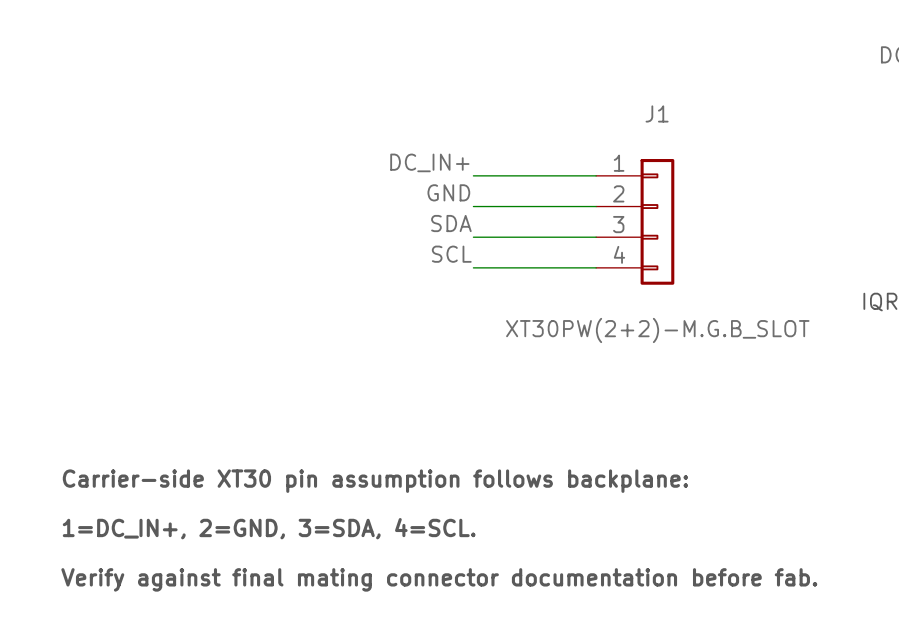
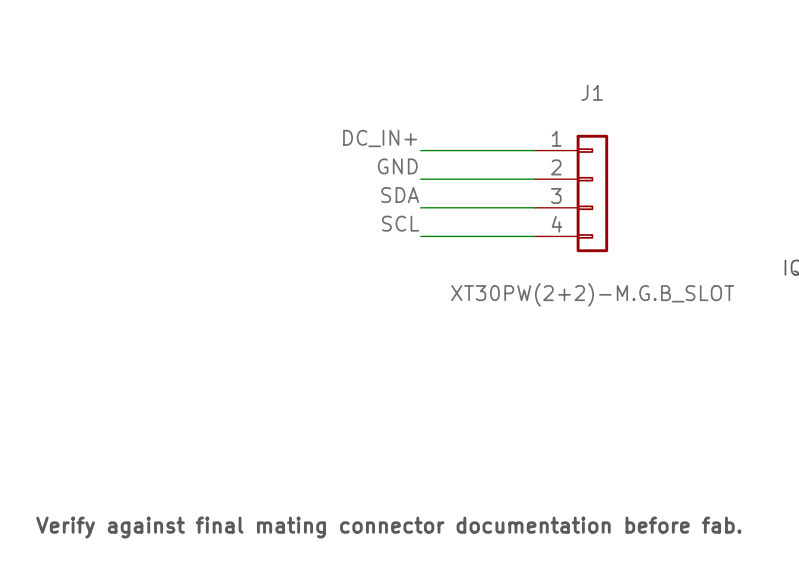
text: Carrier-side XT30 pin assumption follows backplane: (375, 481) -> none
text: 1=DC_IN+, 2=GND, 3=SDA, 4=SCL. (269, 528) -> none

